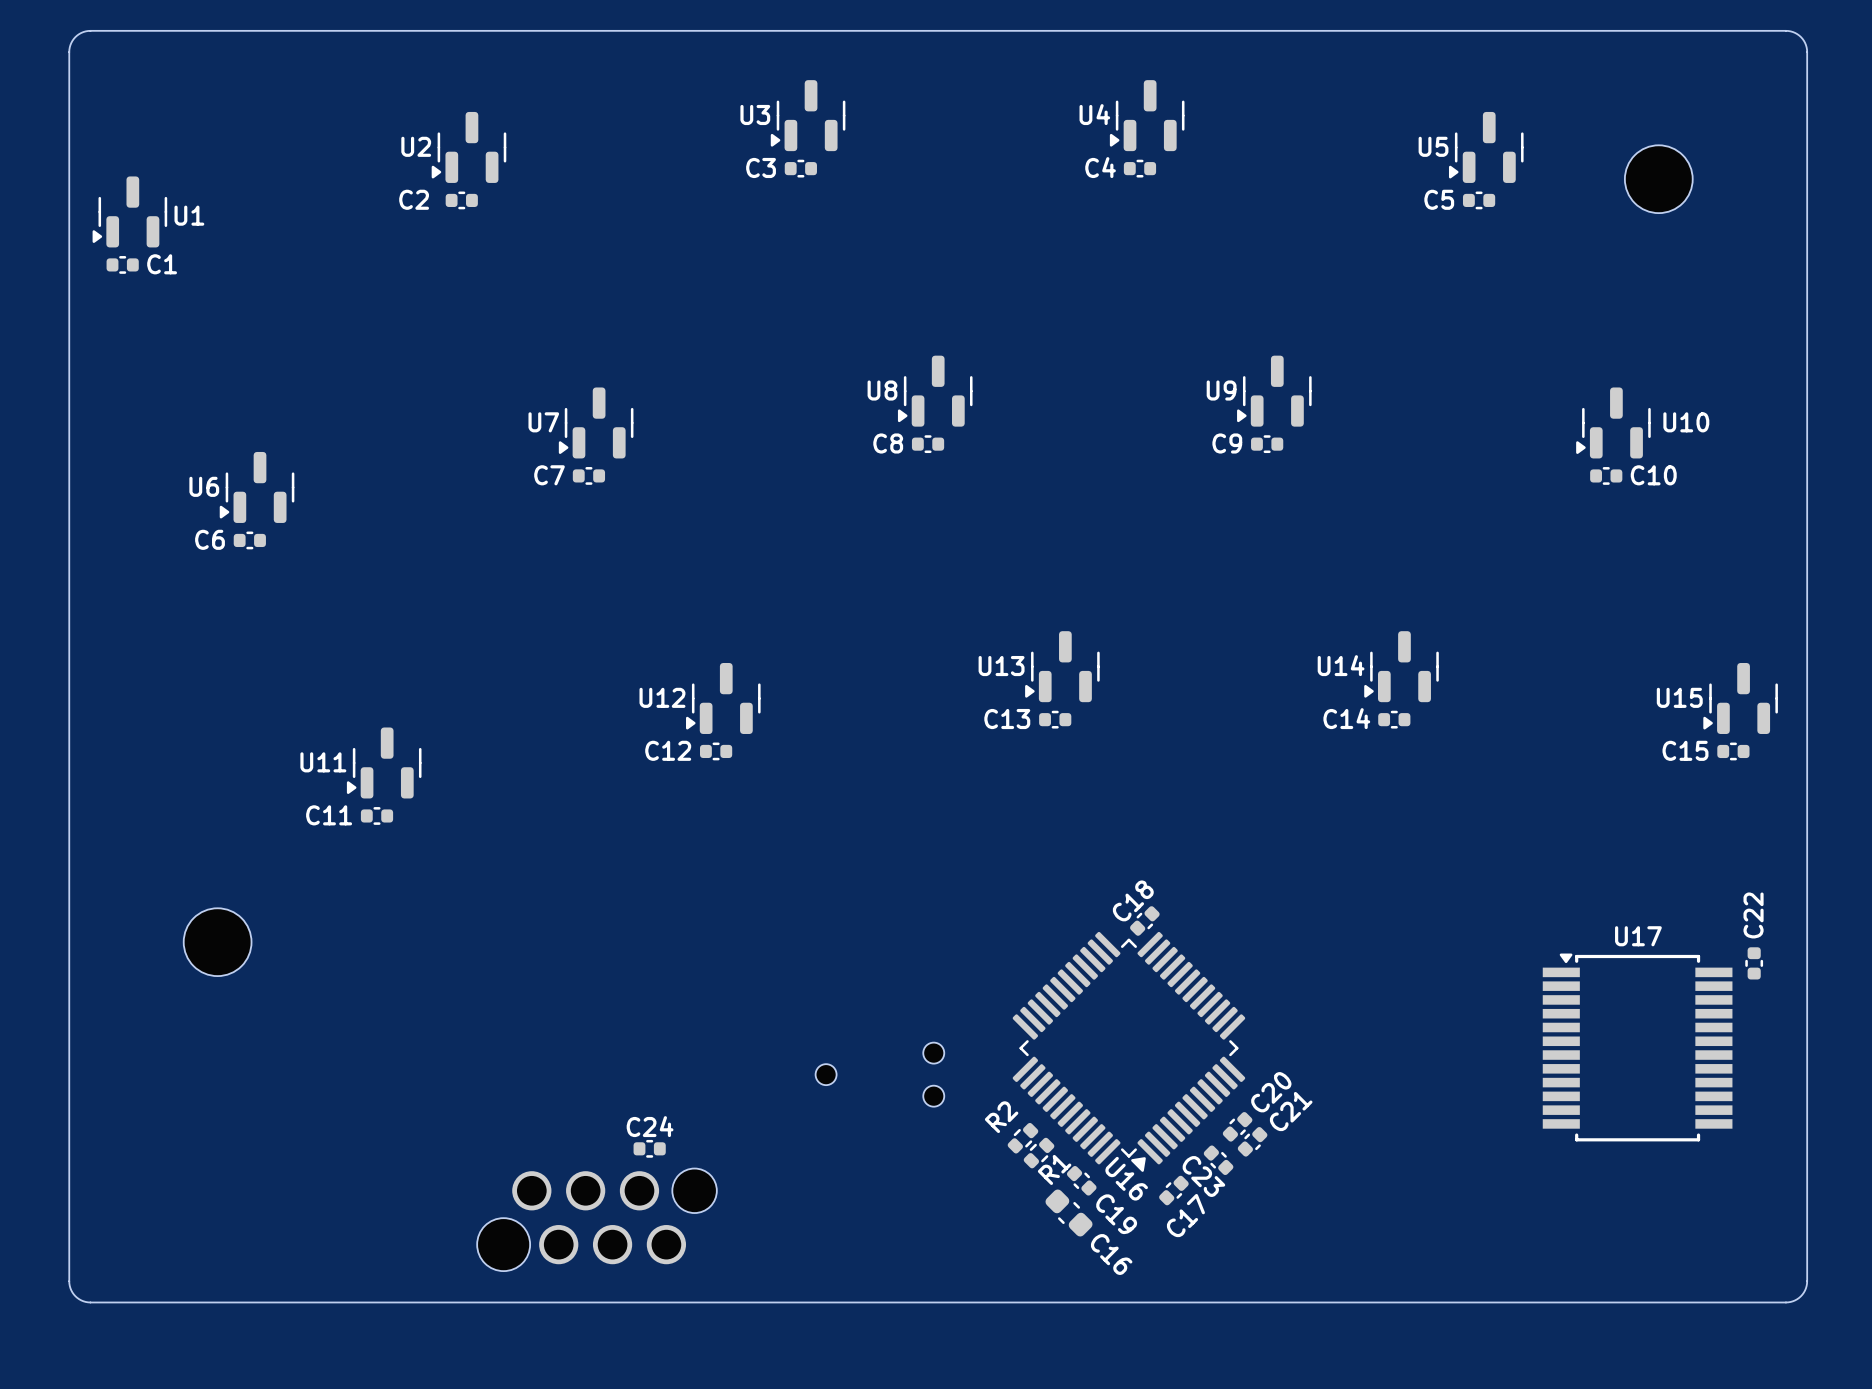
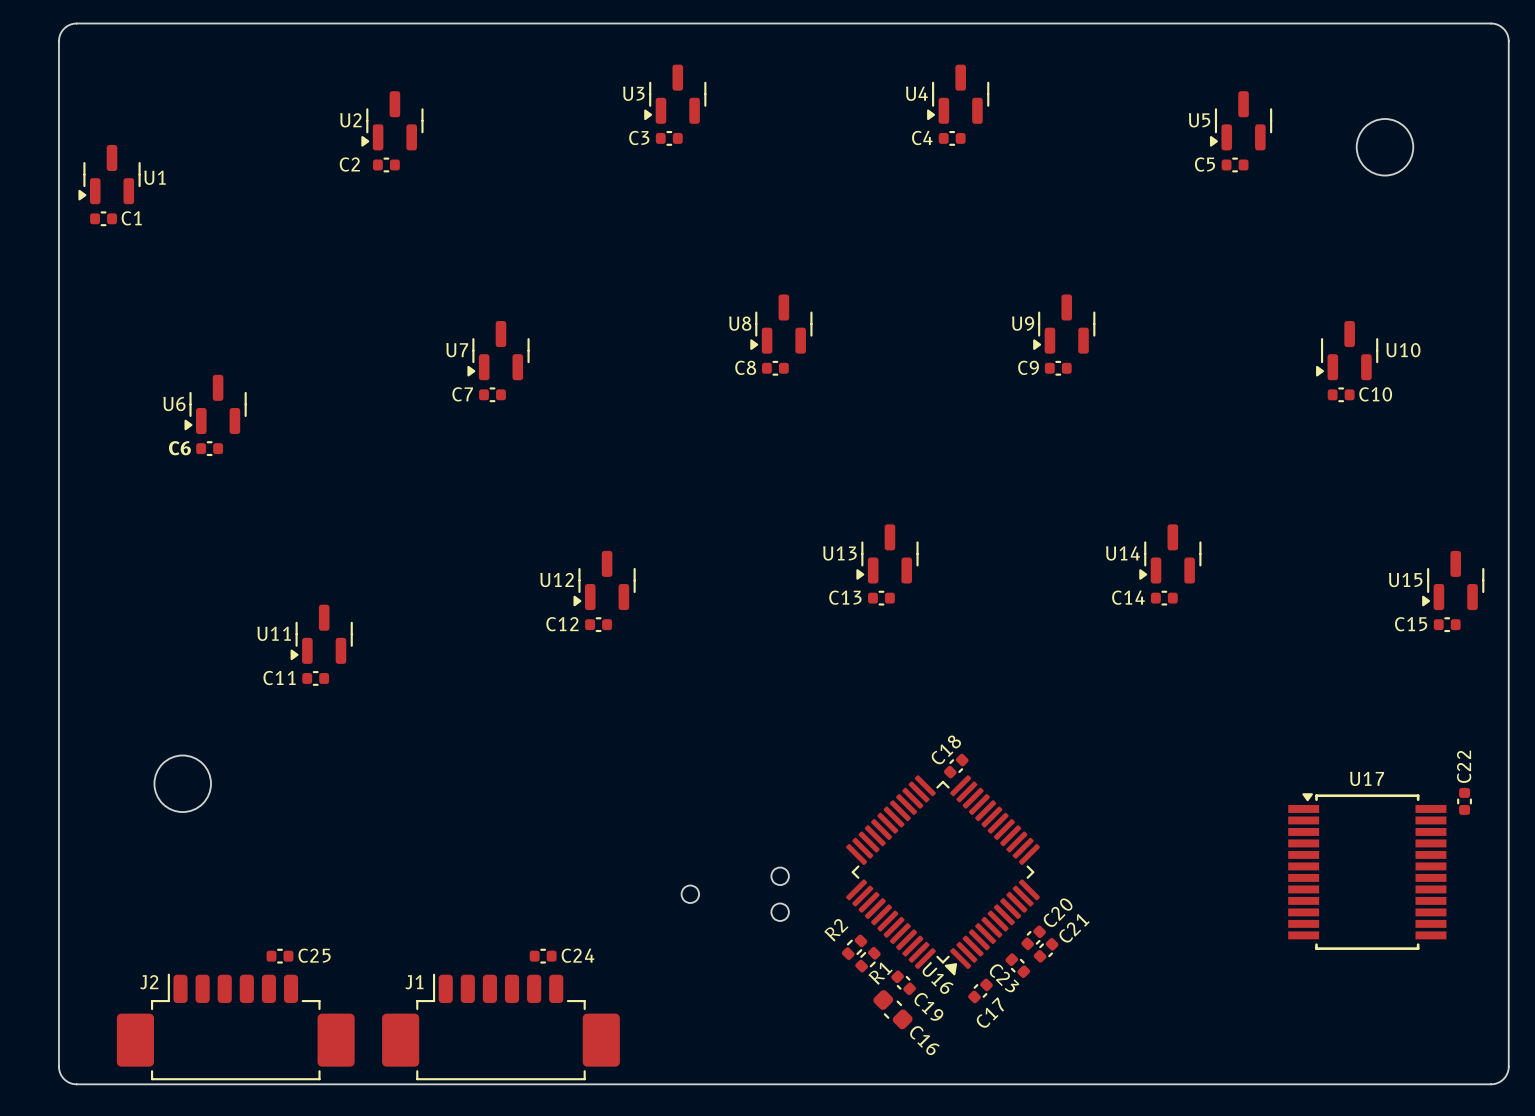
C24 name position: C24 (650, 1126) -> C24 (577, 955)
C25: none -> (279, 956)
part: (596, 1219) -> none
J2: none -> (235, 1026)
J1: none -> (500, 1026)

